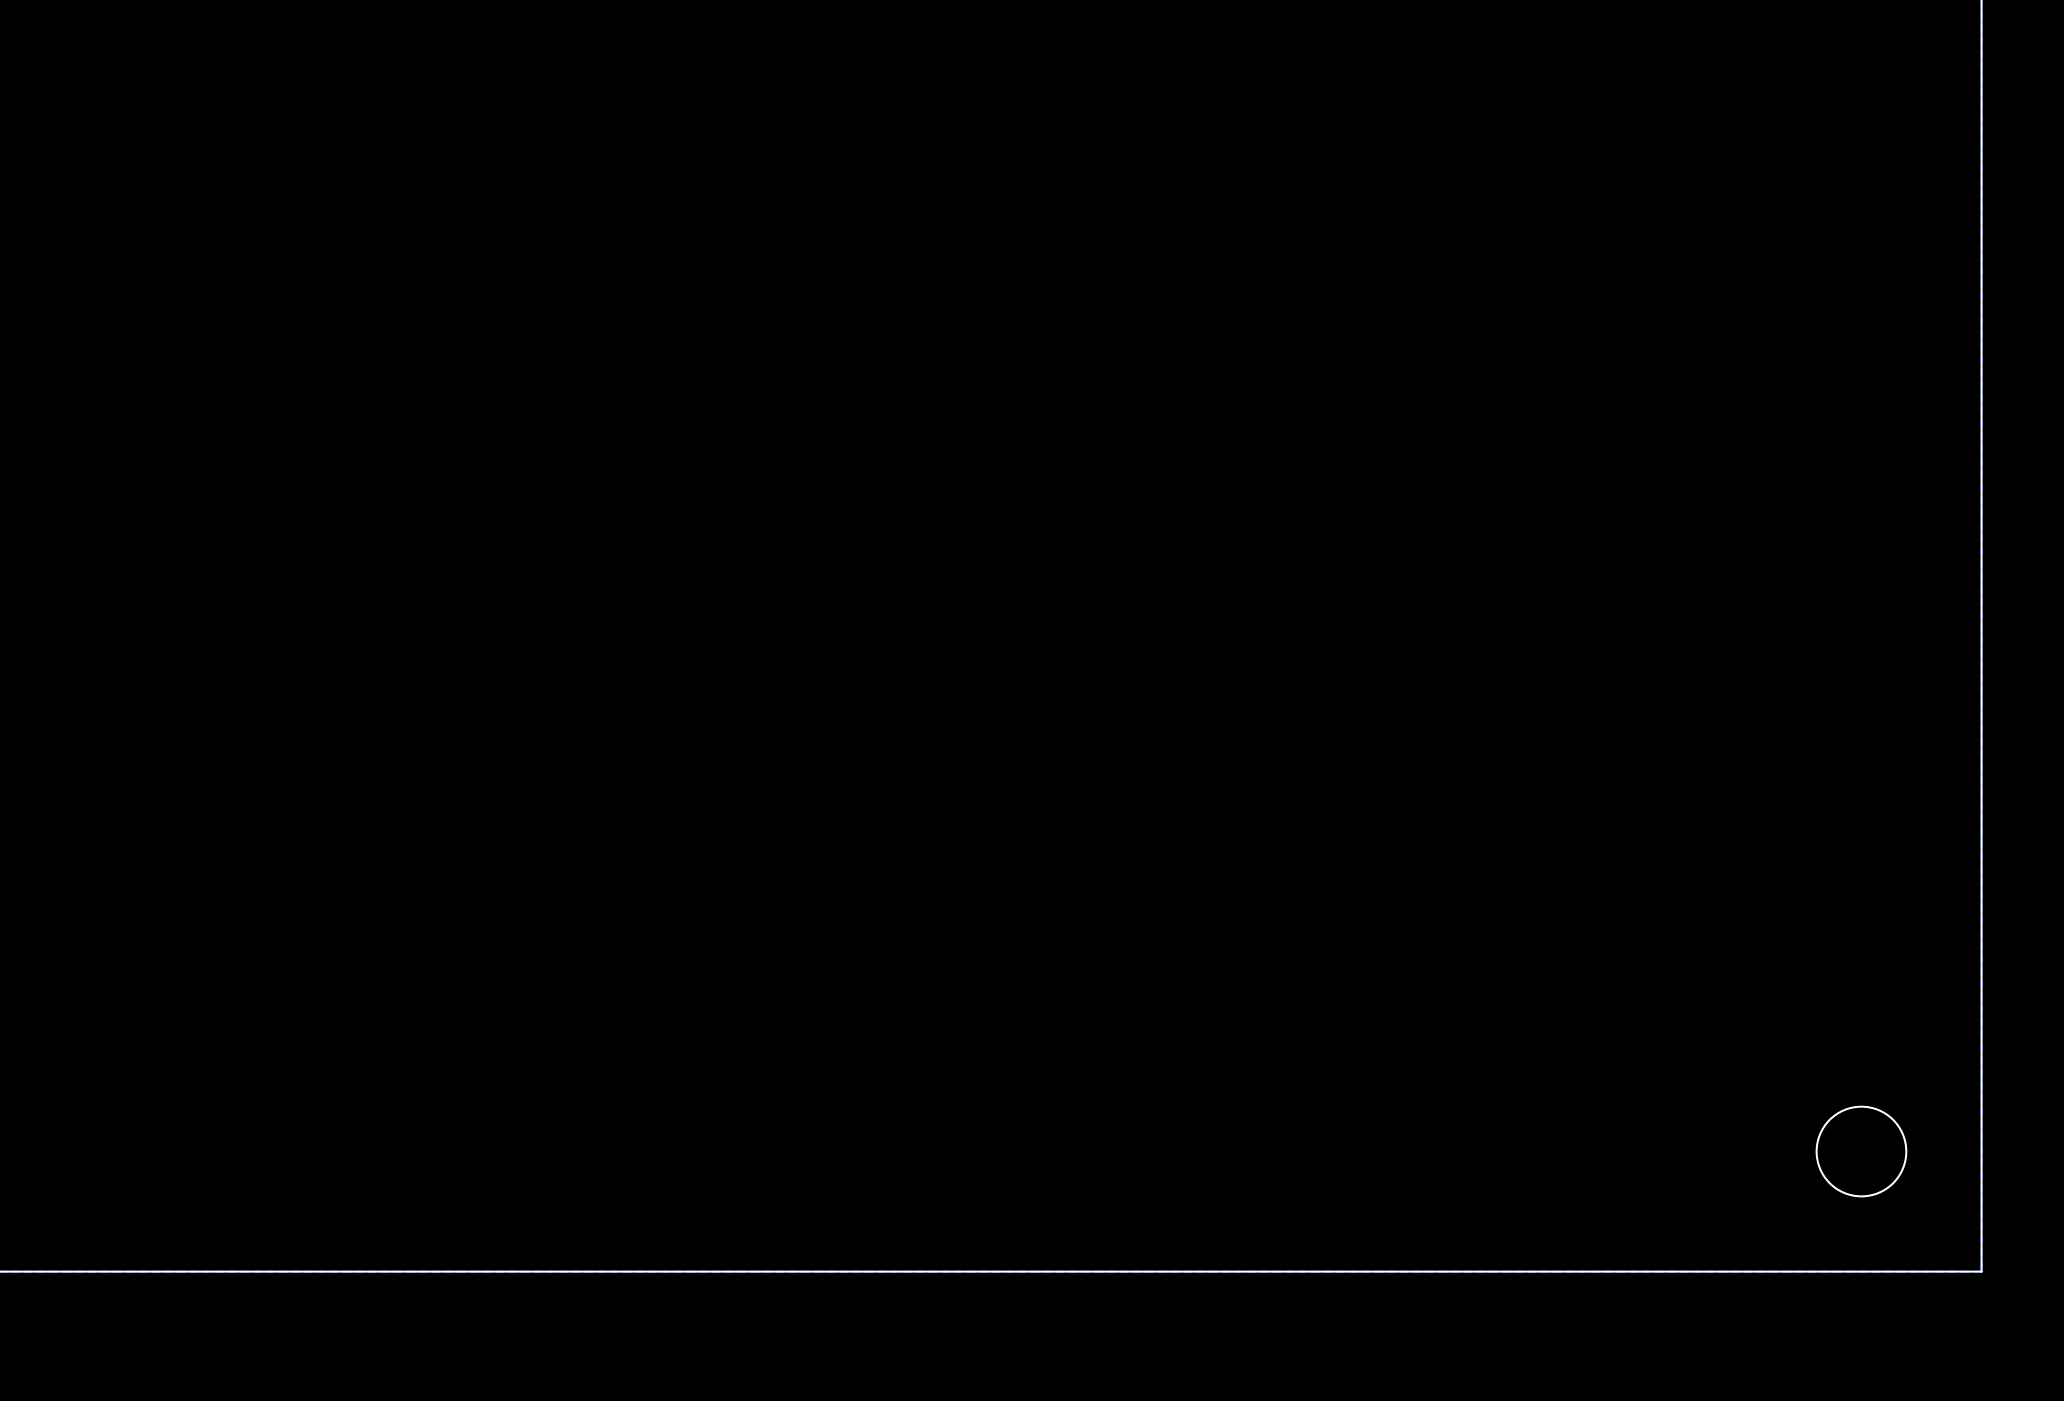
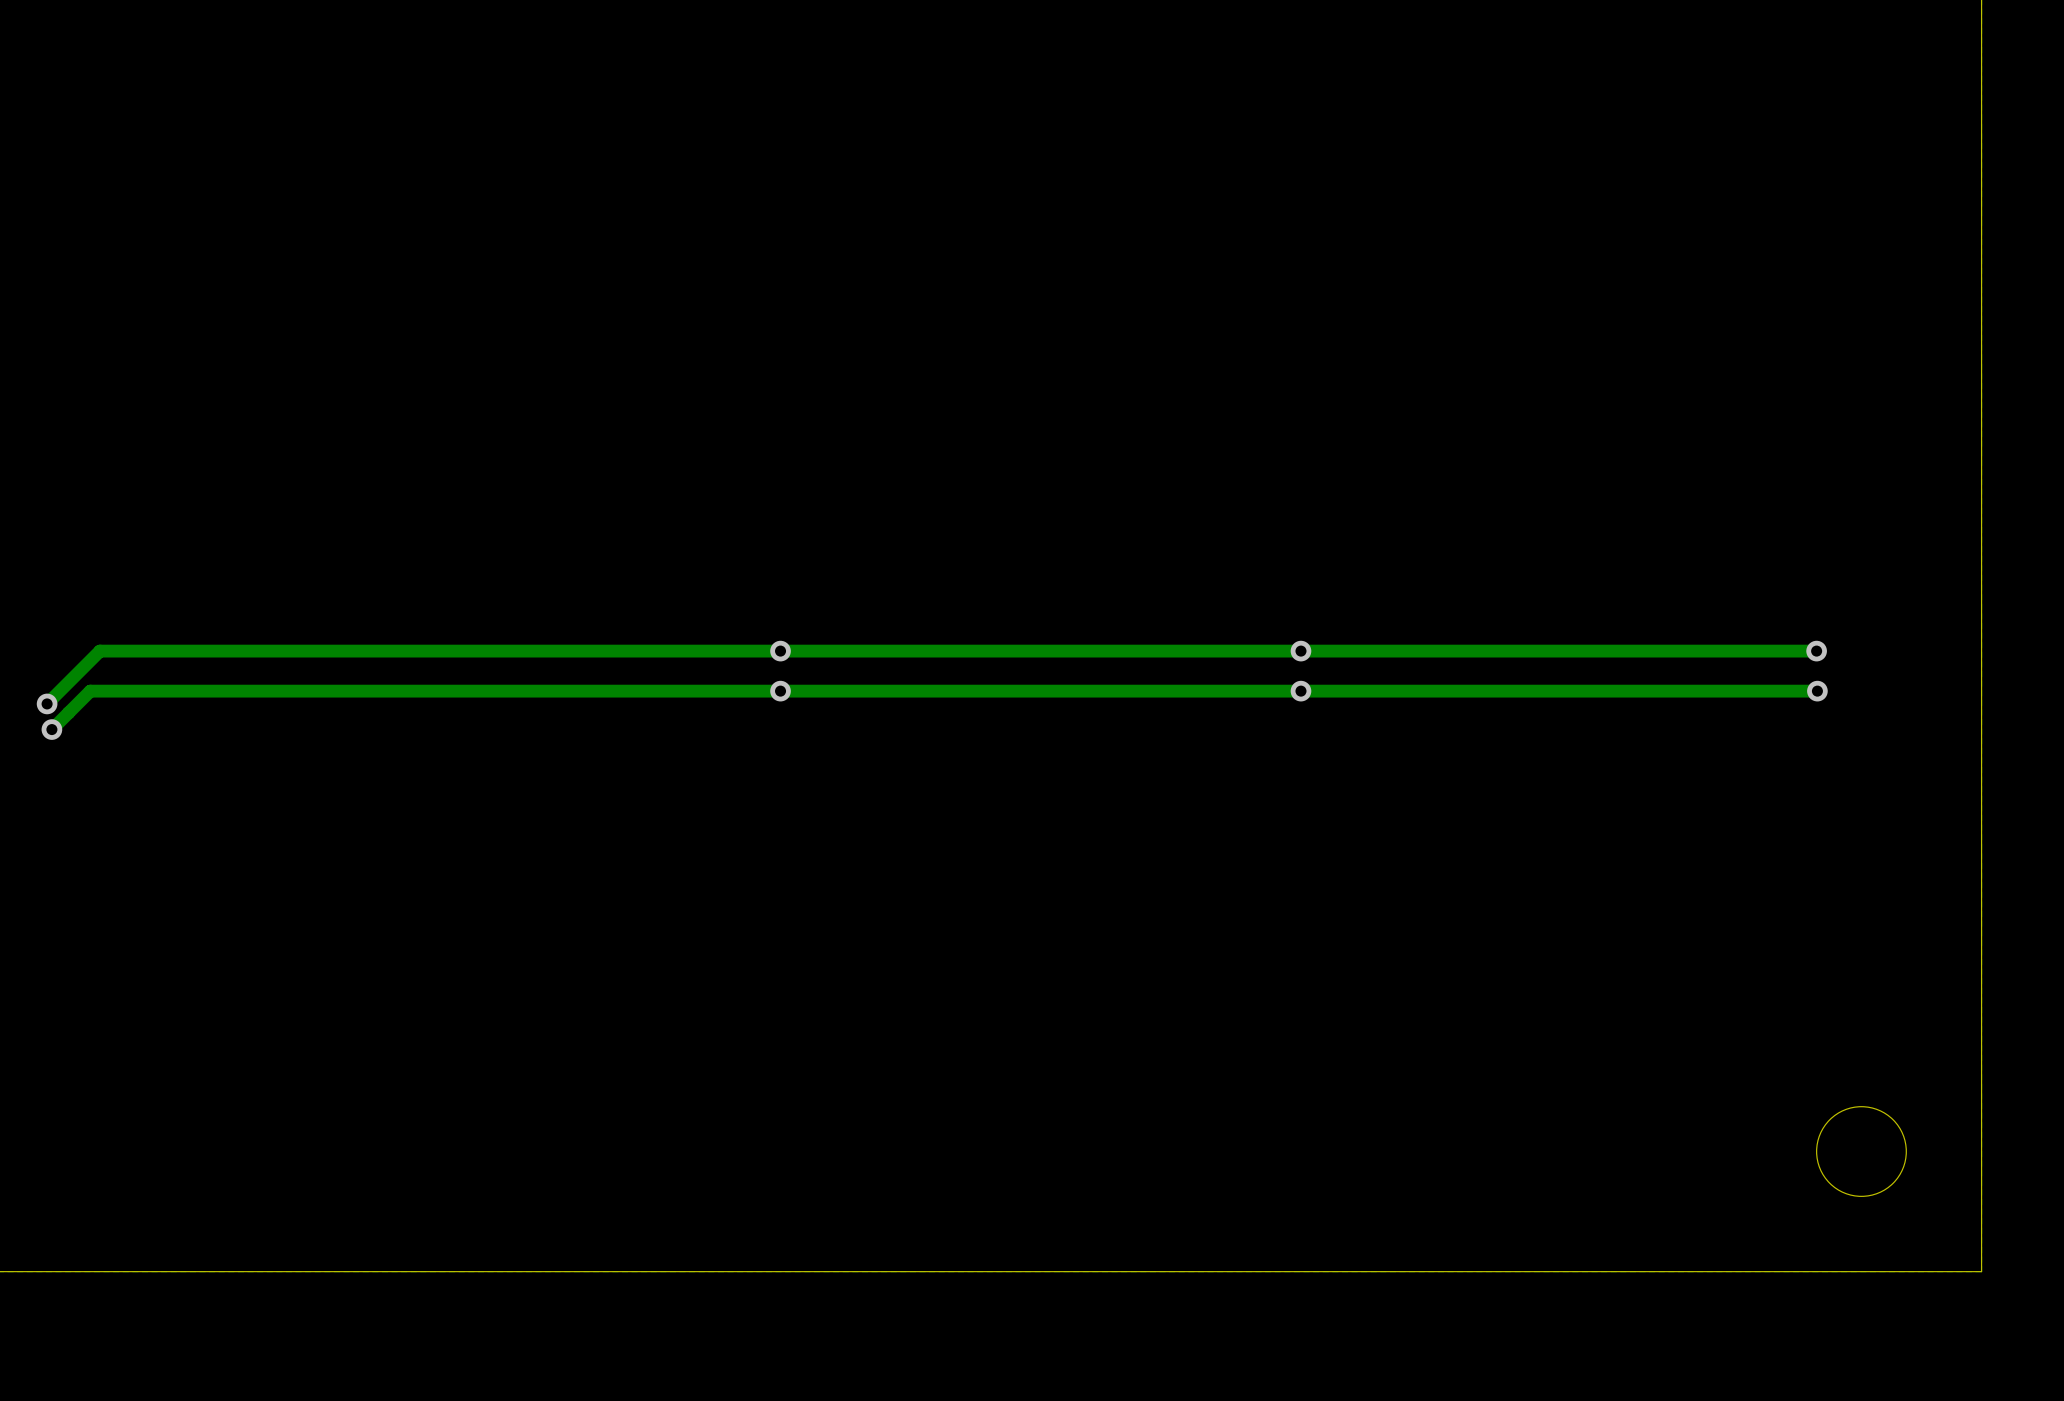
via: none -> (780, 651)
via: none -> (1300, 651)
track: none -> (1816, 651) (99, 651) (47, 703)
via: none -> (1816, 651)
via: none -> (780, 691)
via: none -> (1300, 691)
track: none -> (1817, 691) (90, 691) (51, 729)
via: none -> (1817, 691)
via: none -> (47, 703)
via: none -> (51, 729)

